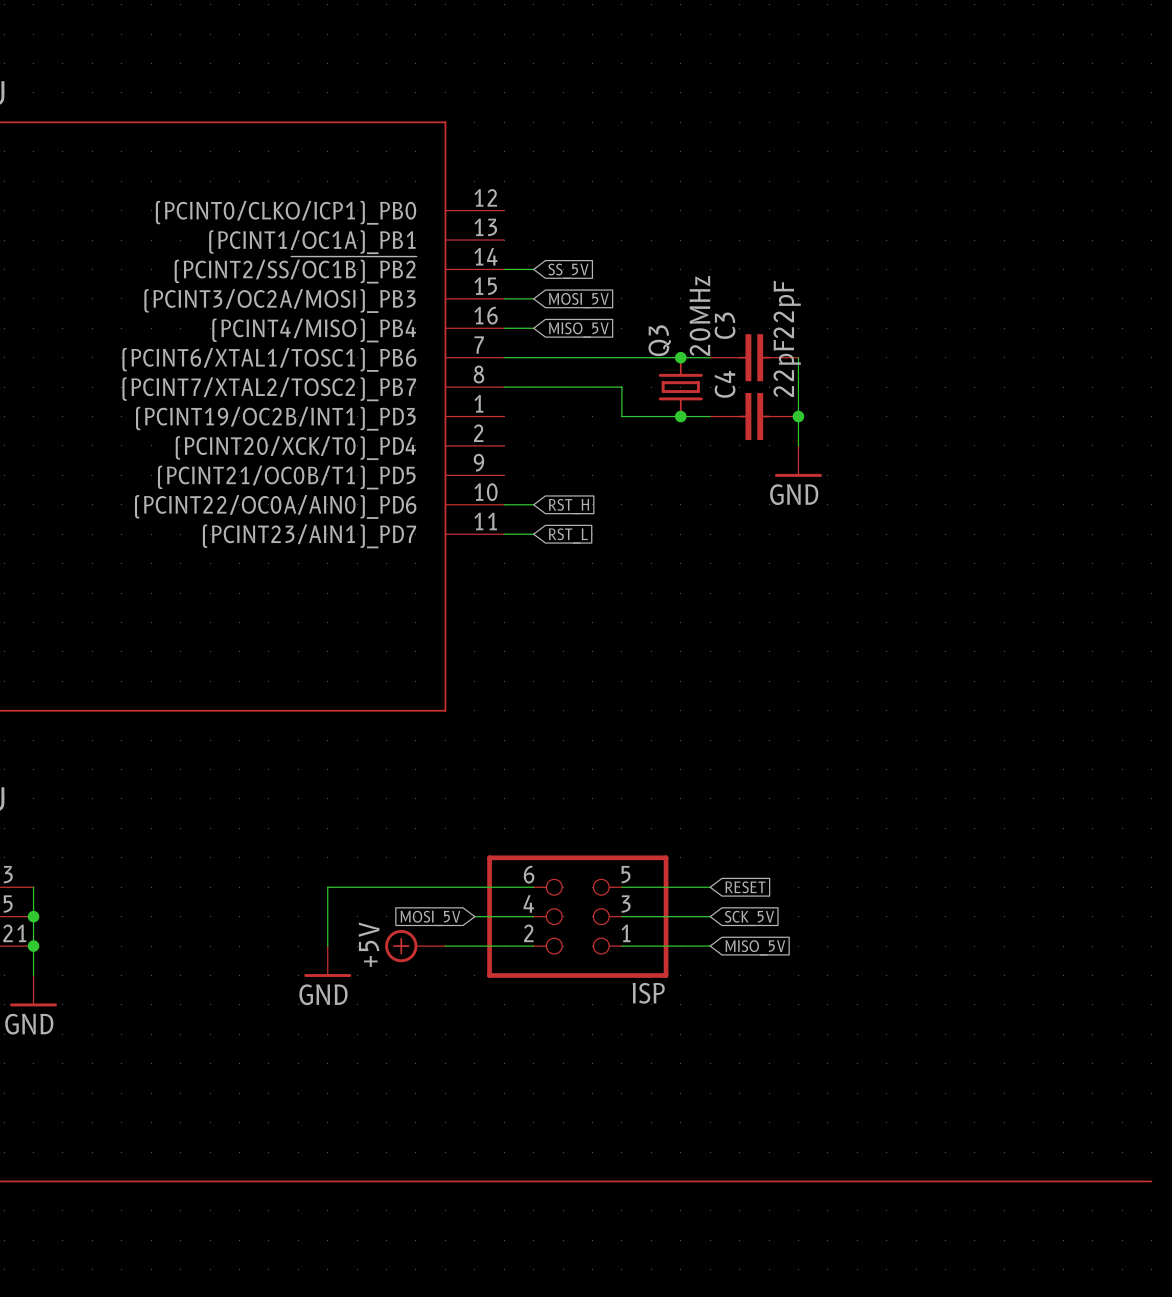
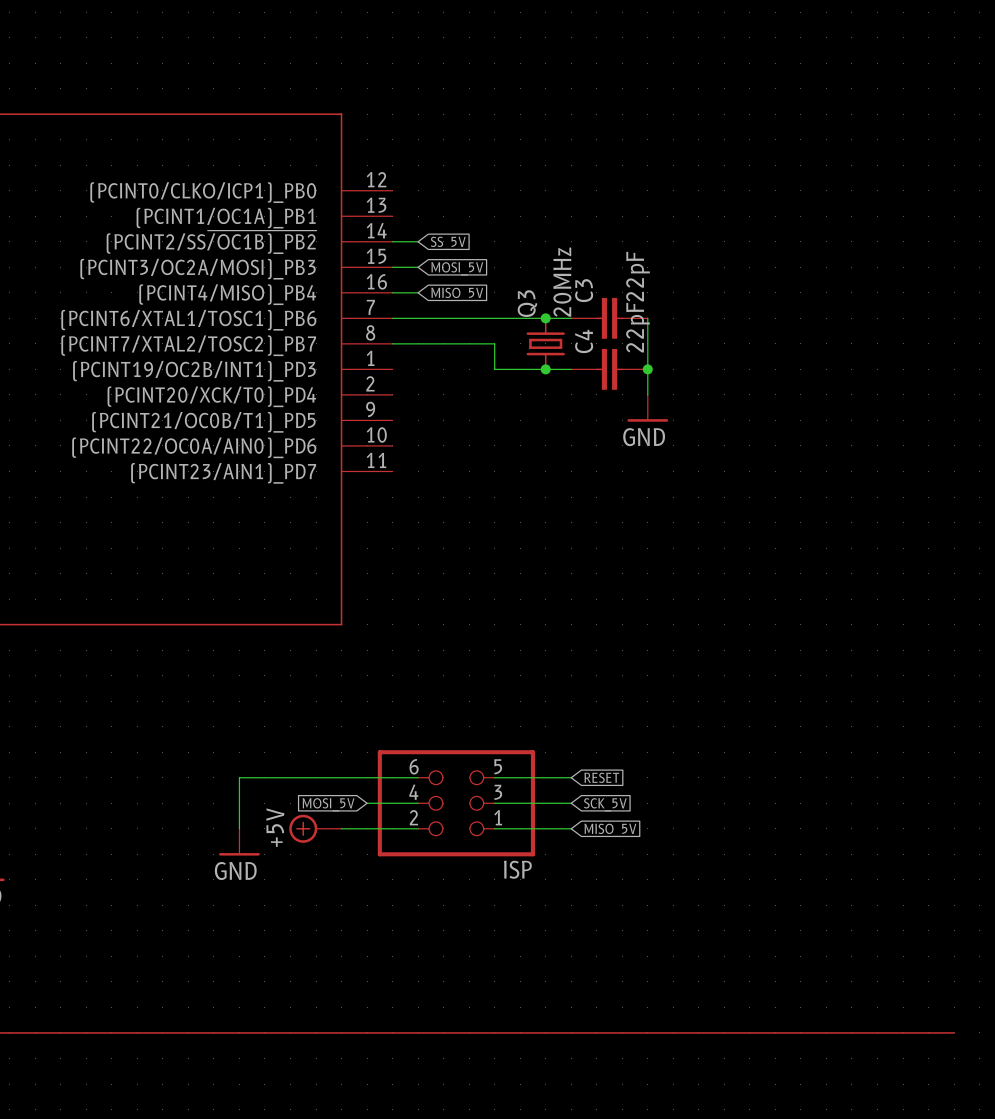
wire: (504, 504) (533, 504) -> none
global label: RST_H (568, 506) -> none
wire: (504, 534) (533, 534) -> none
global label: RST_L (568, 535) -> none

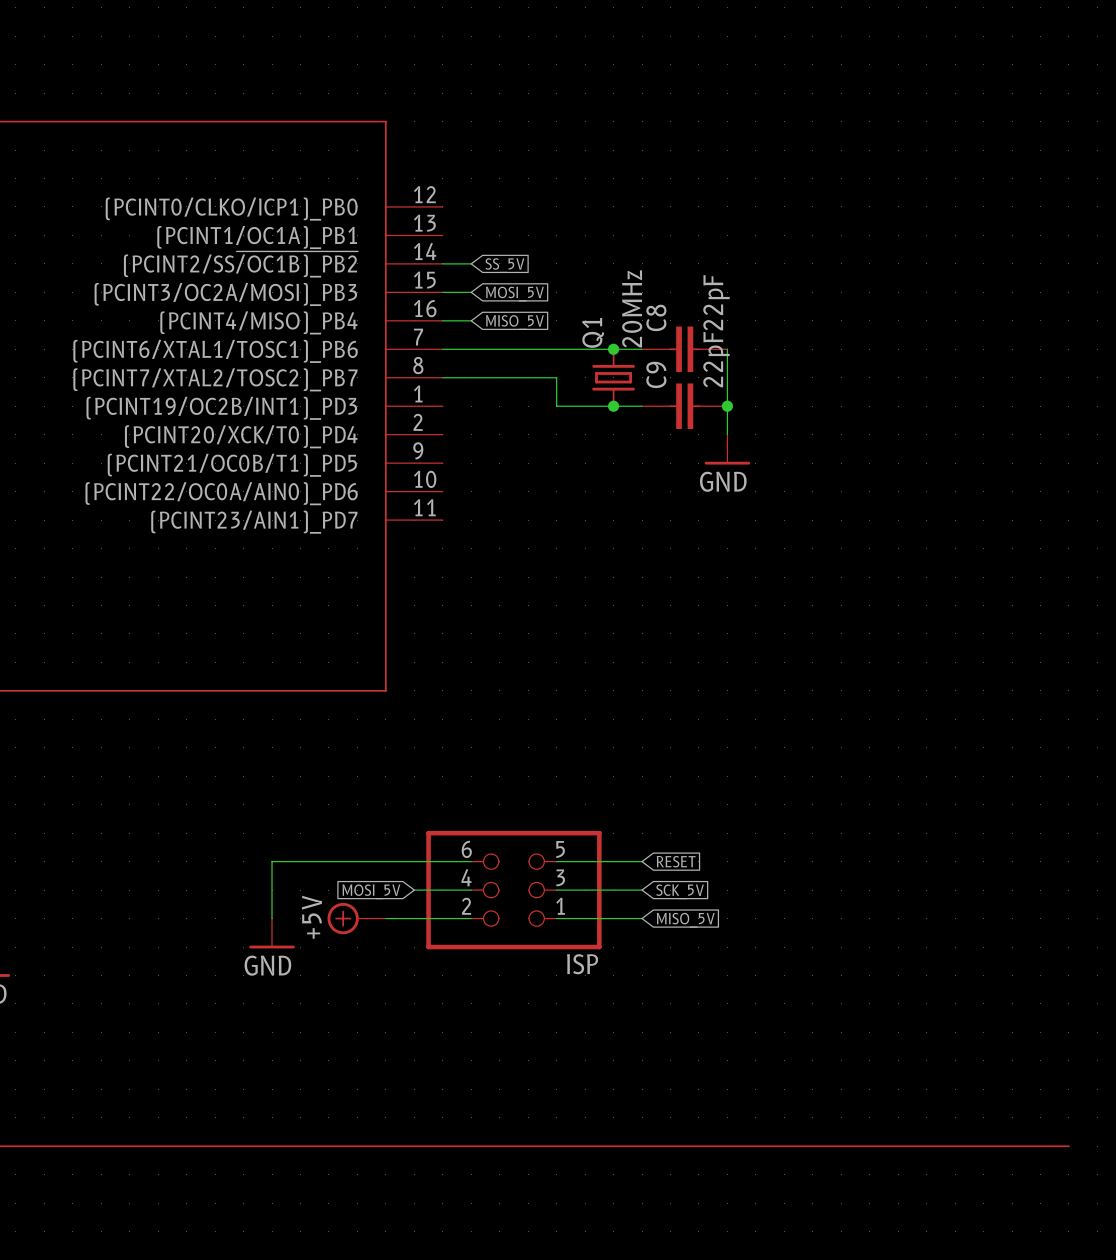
C3 name: C3 (584, 290) -> C8 (656, 317)
Q3 name: Q3 (527, 303) -> Q1 (593, 332)
C4 name: C4 (584, 341) -> C9 (656, 374)

